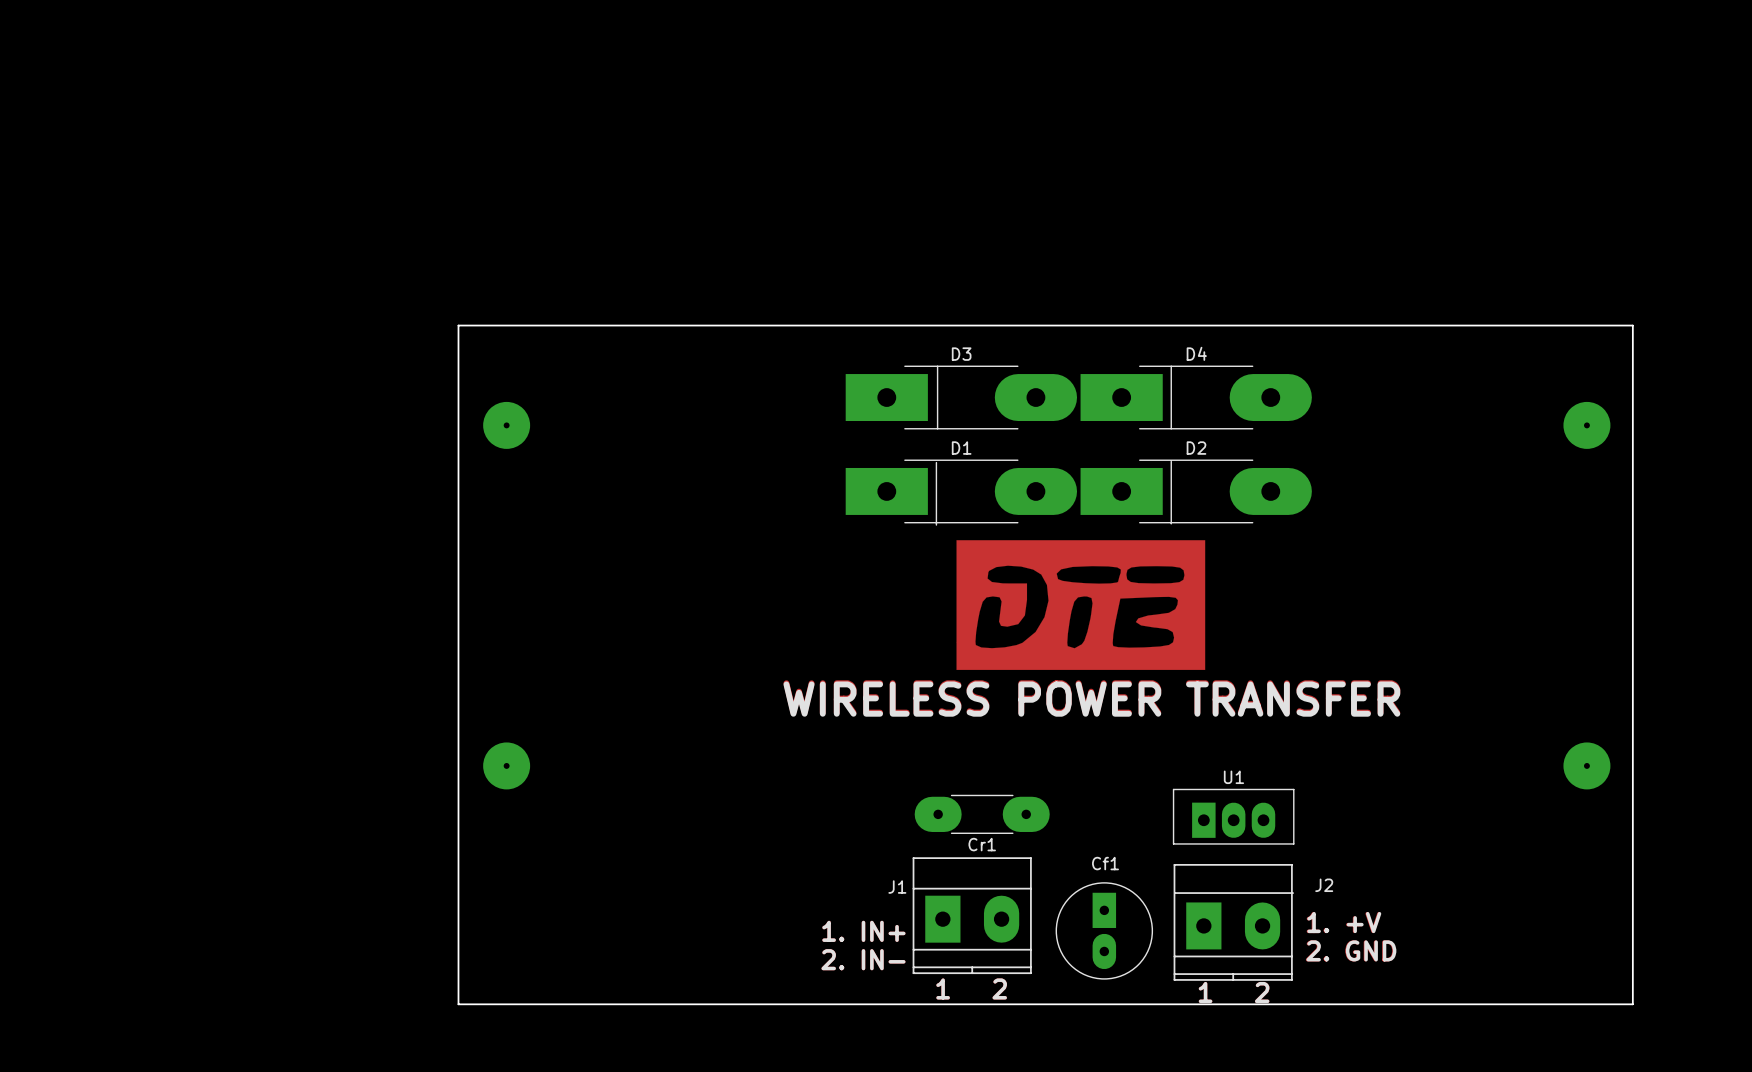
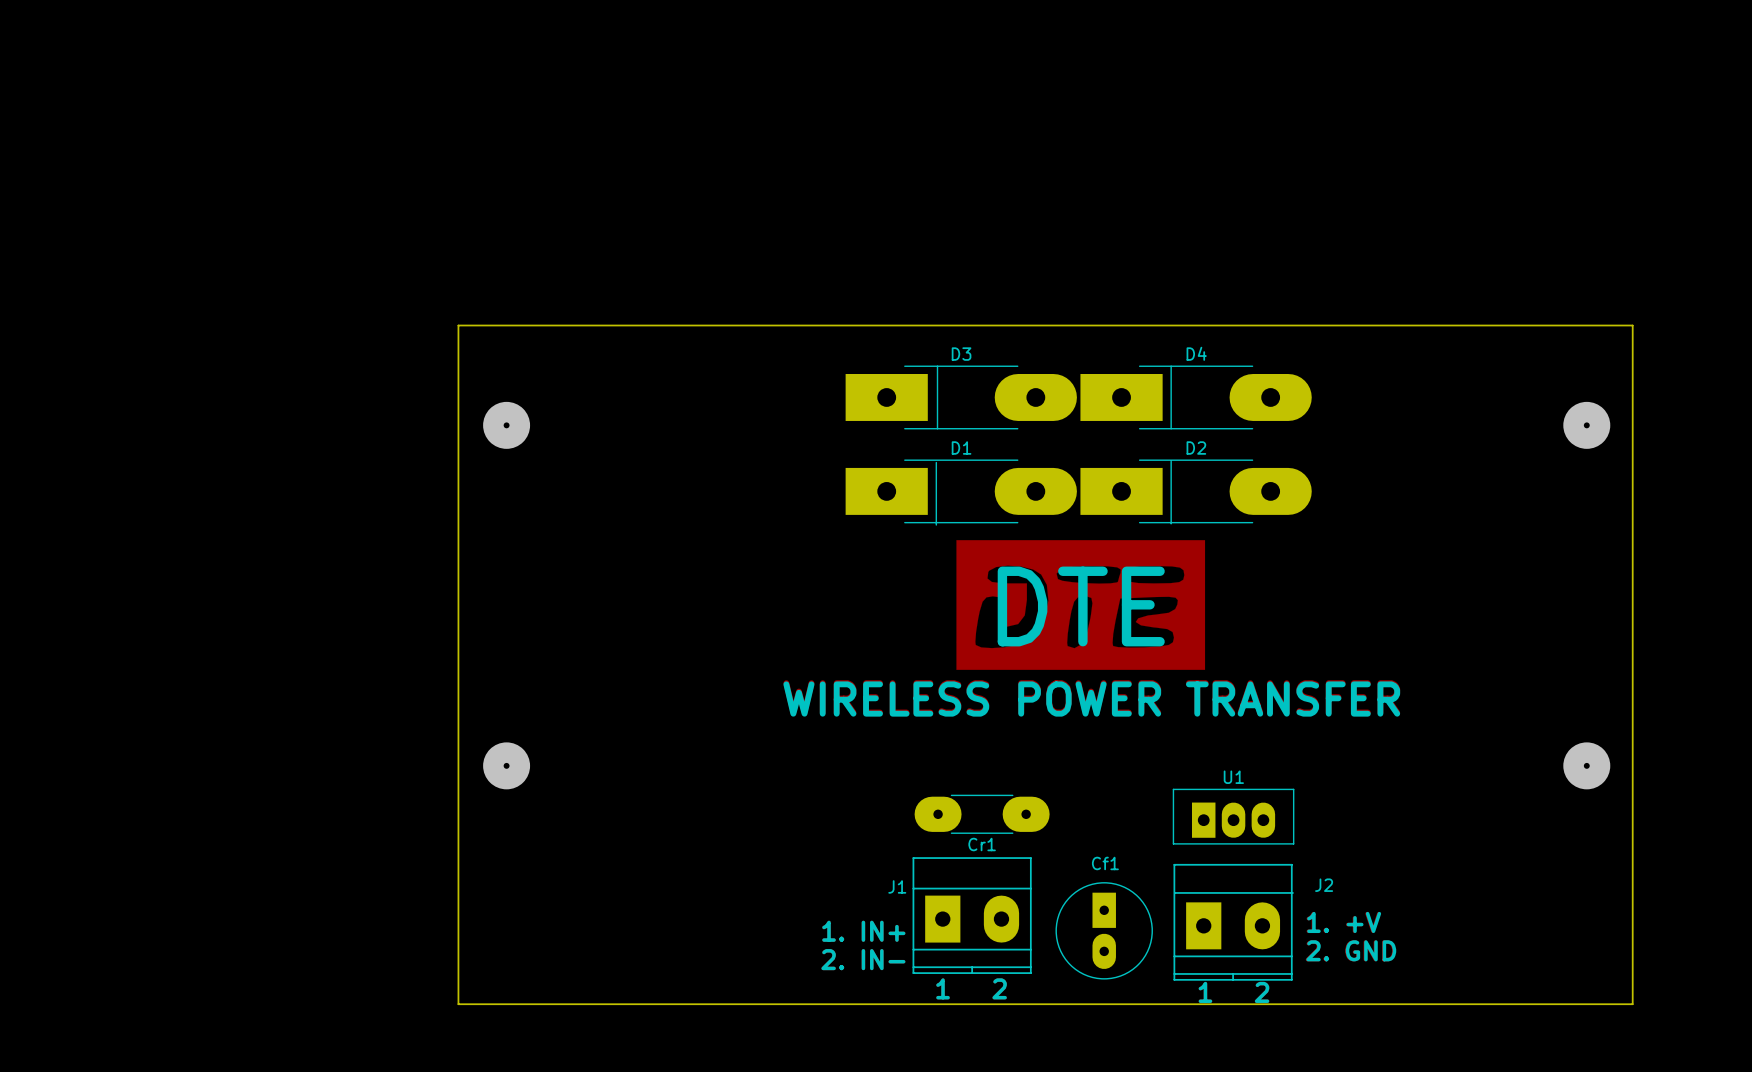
text: none -> DTE (1081, 606)

